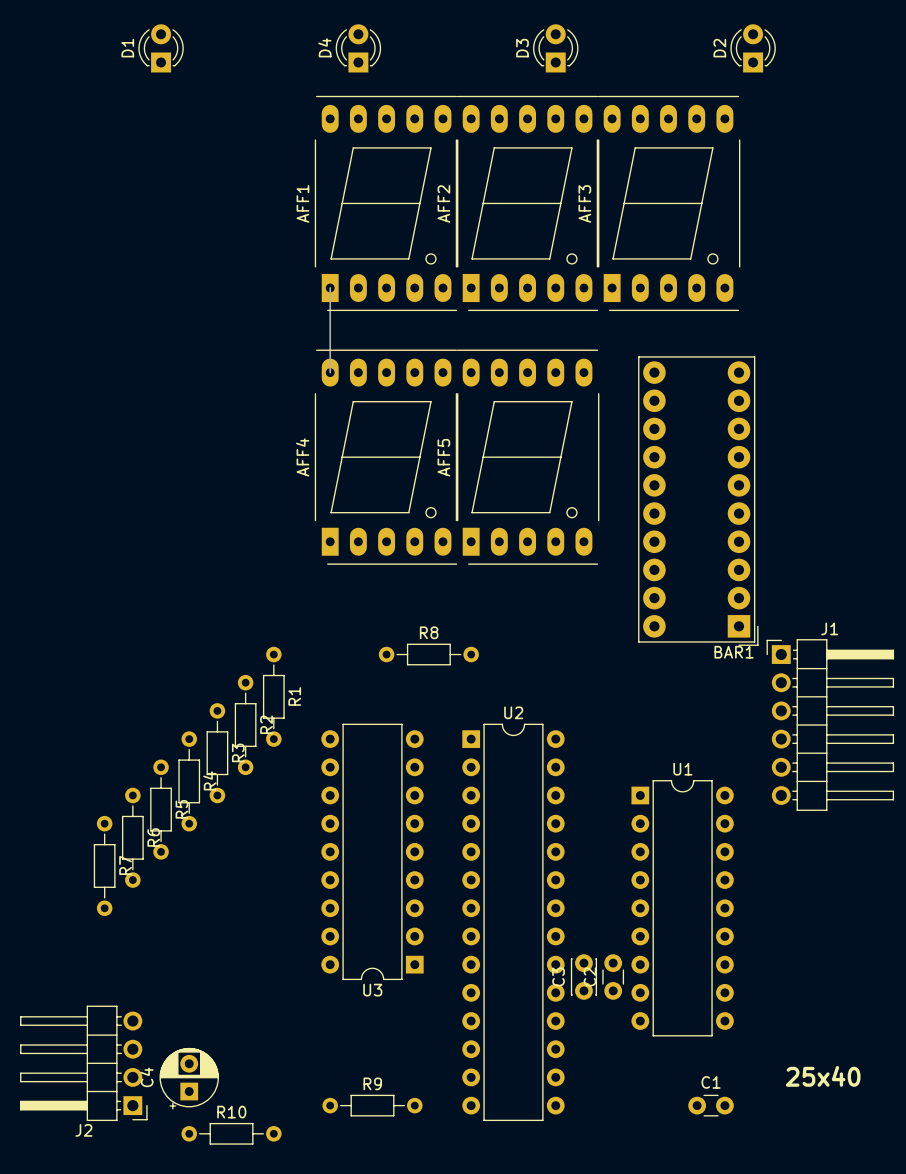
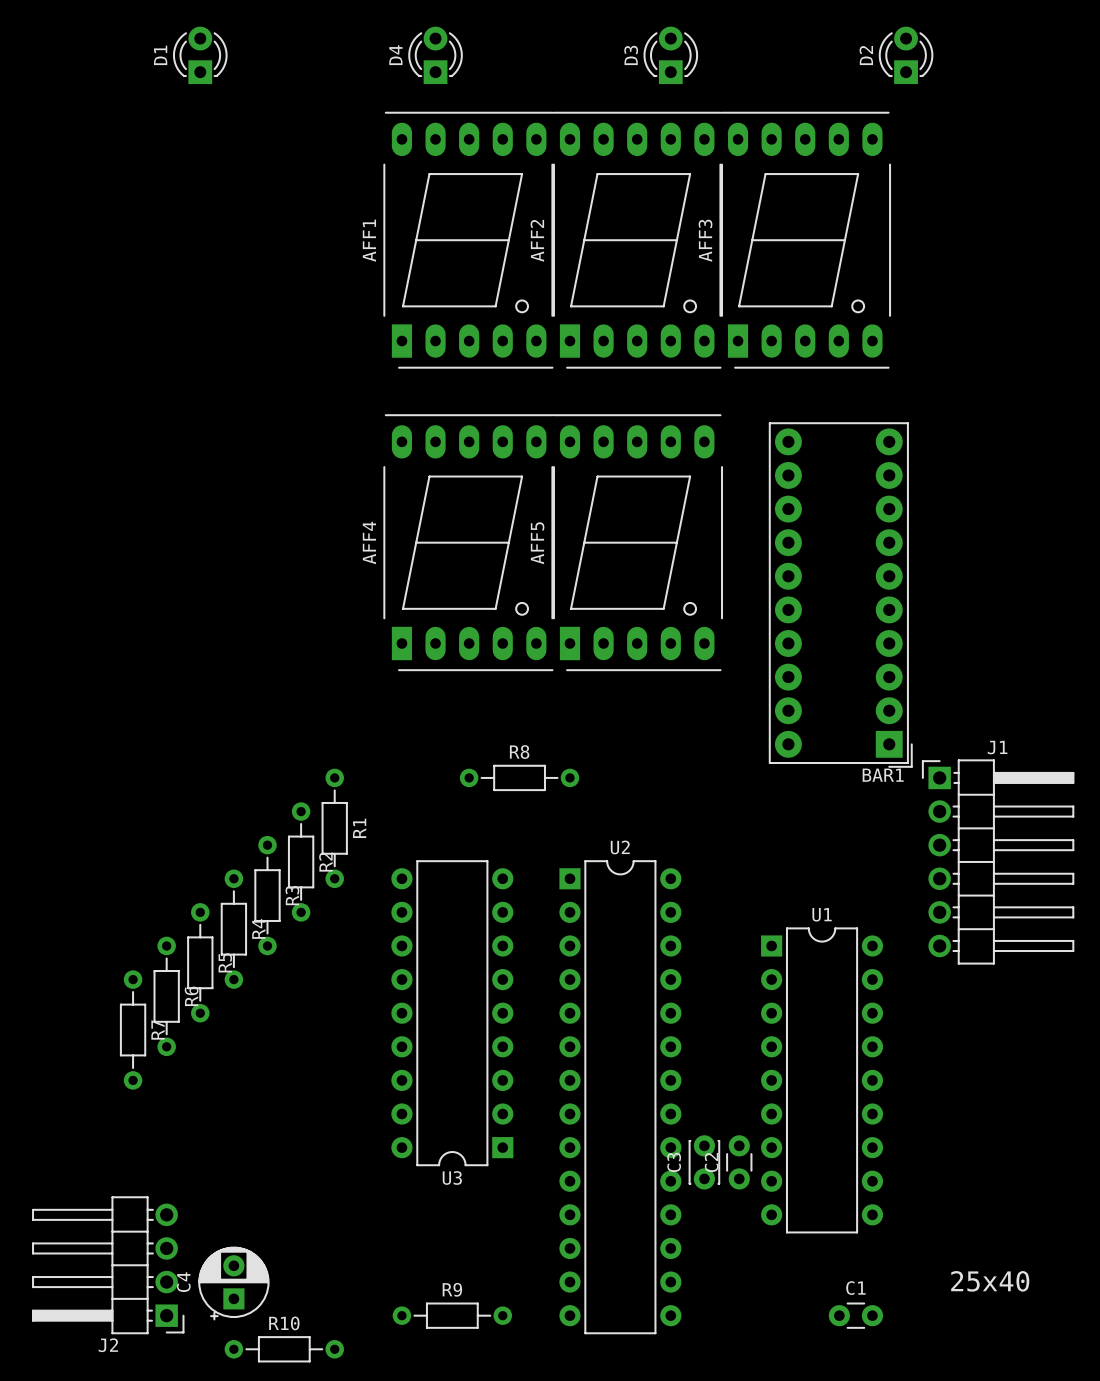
line: (330, 288) (330, 372) -> none

